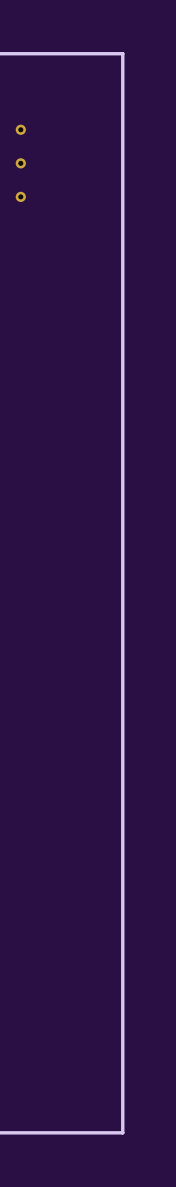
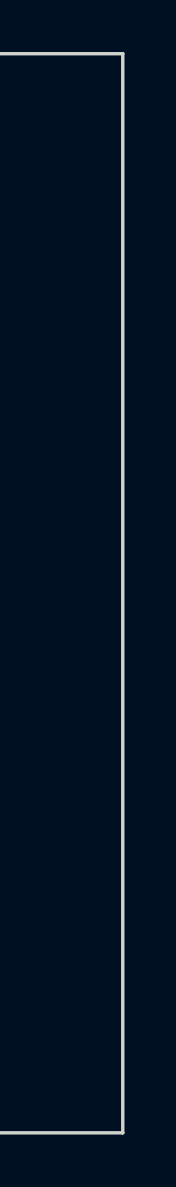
via: (20, 129) -> none
via: (20, 163) -> none
via: (20, 196) -> none

